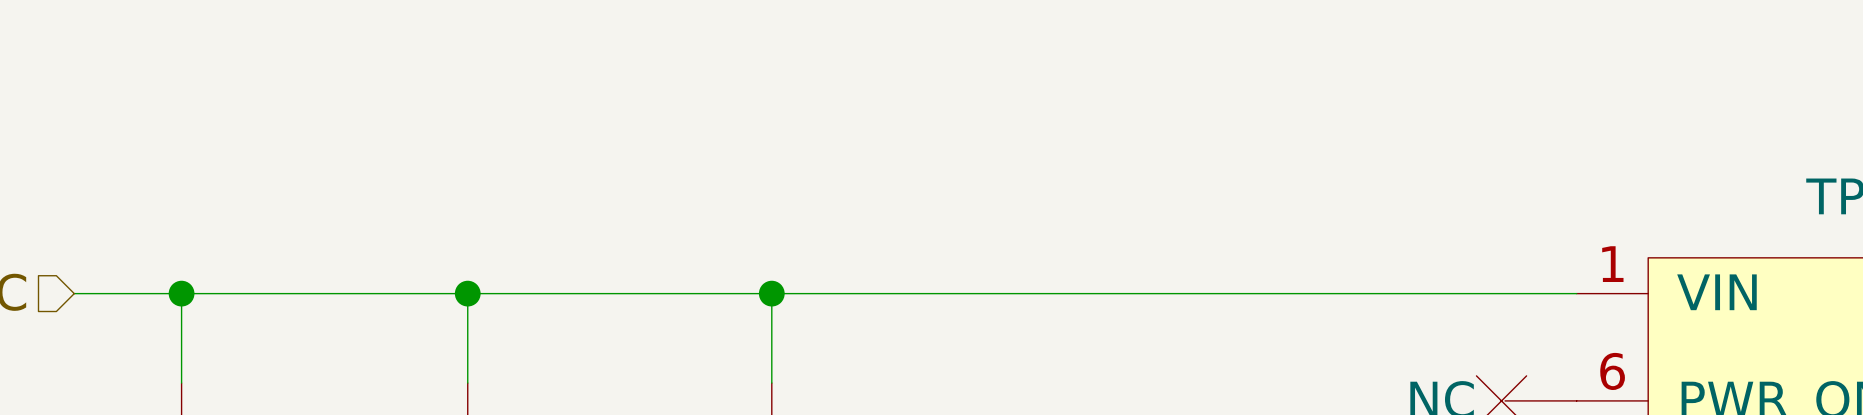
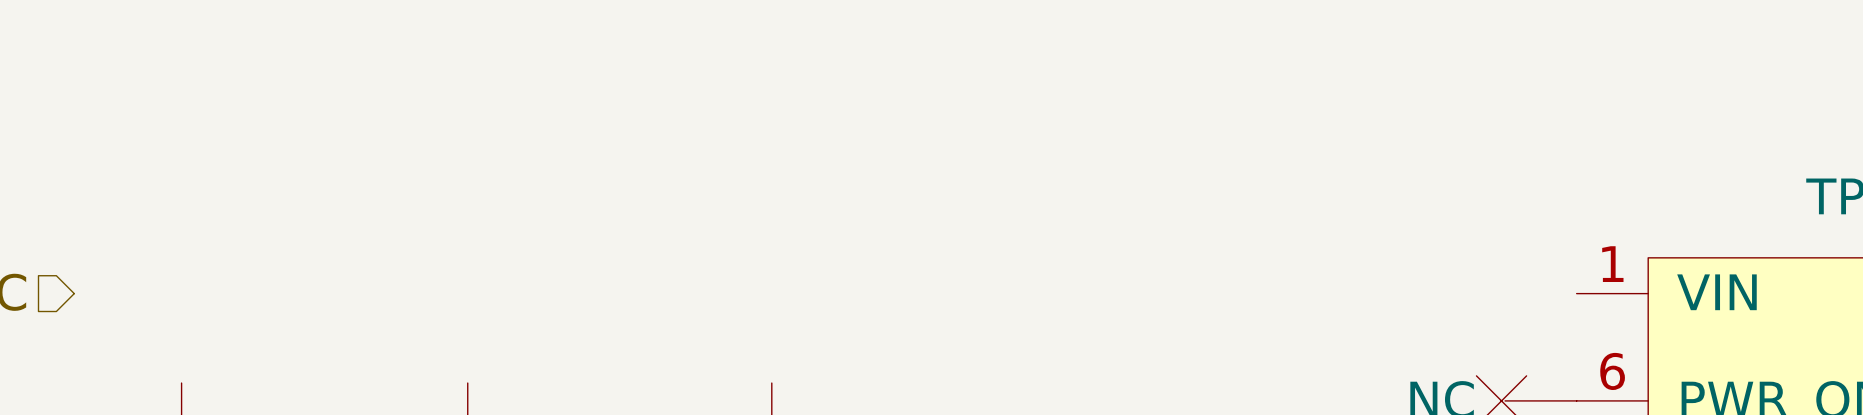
wire: (74, 293) (1576, 293) -> none
wire: (181, 293) (181, 383) -> none
junction: (181, 293) -> none
wire: (467, 293) (467, 383) -> none
junction: (467, 293) -> none
wire: (771, 293) (771, 383) -> none
junction: (771, 293) -> none

